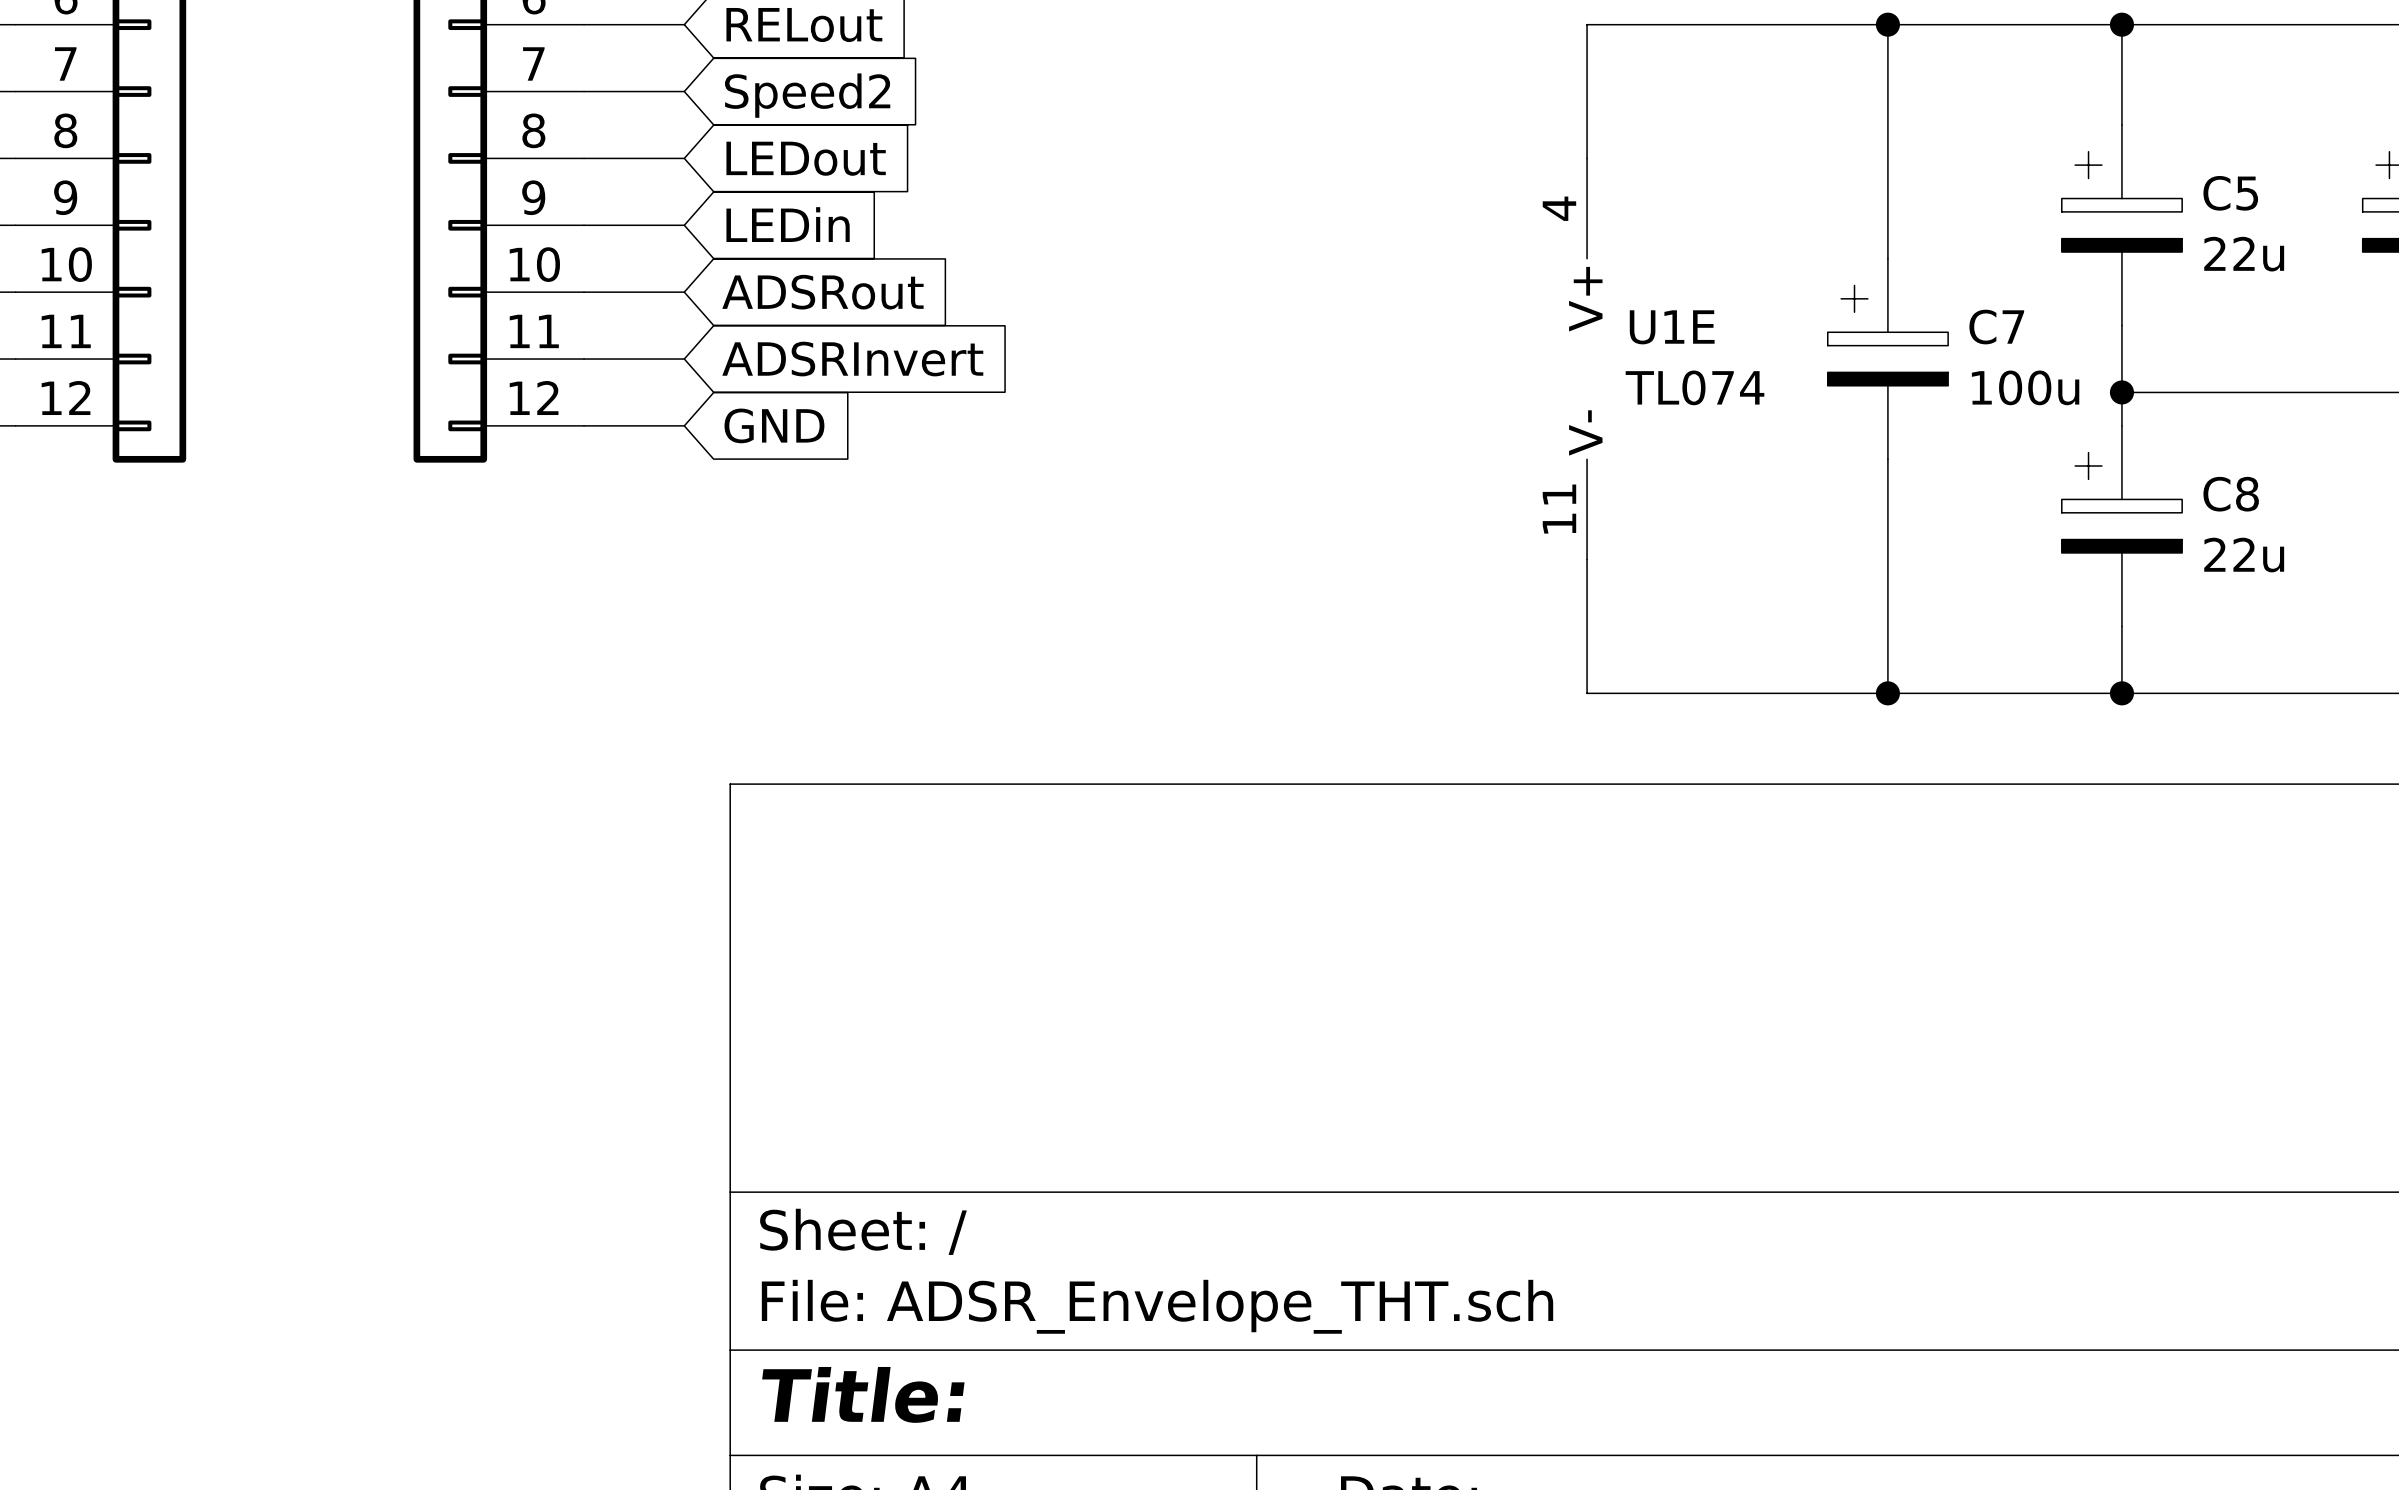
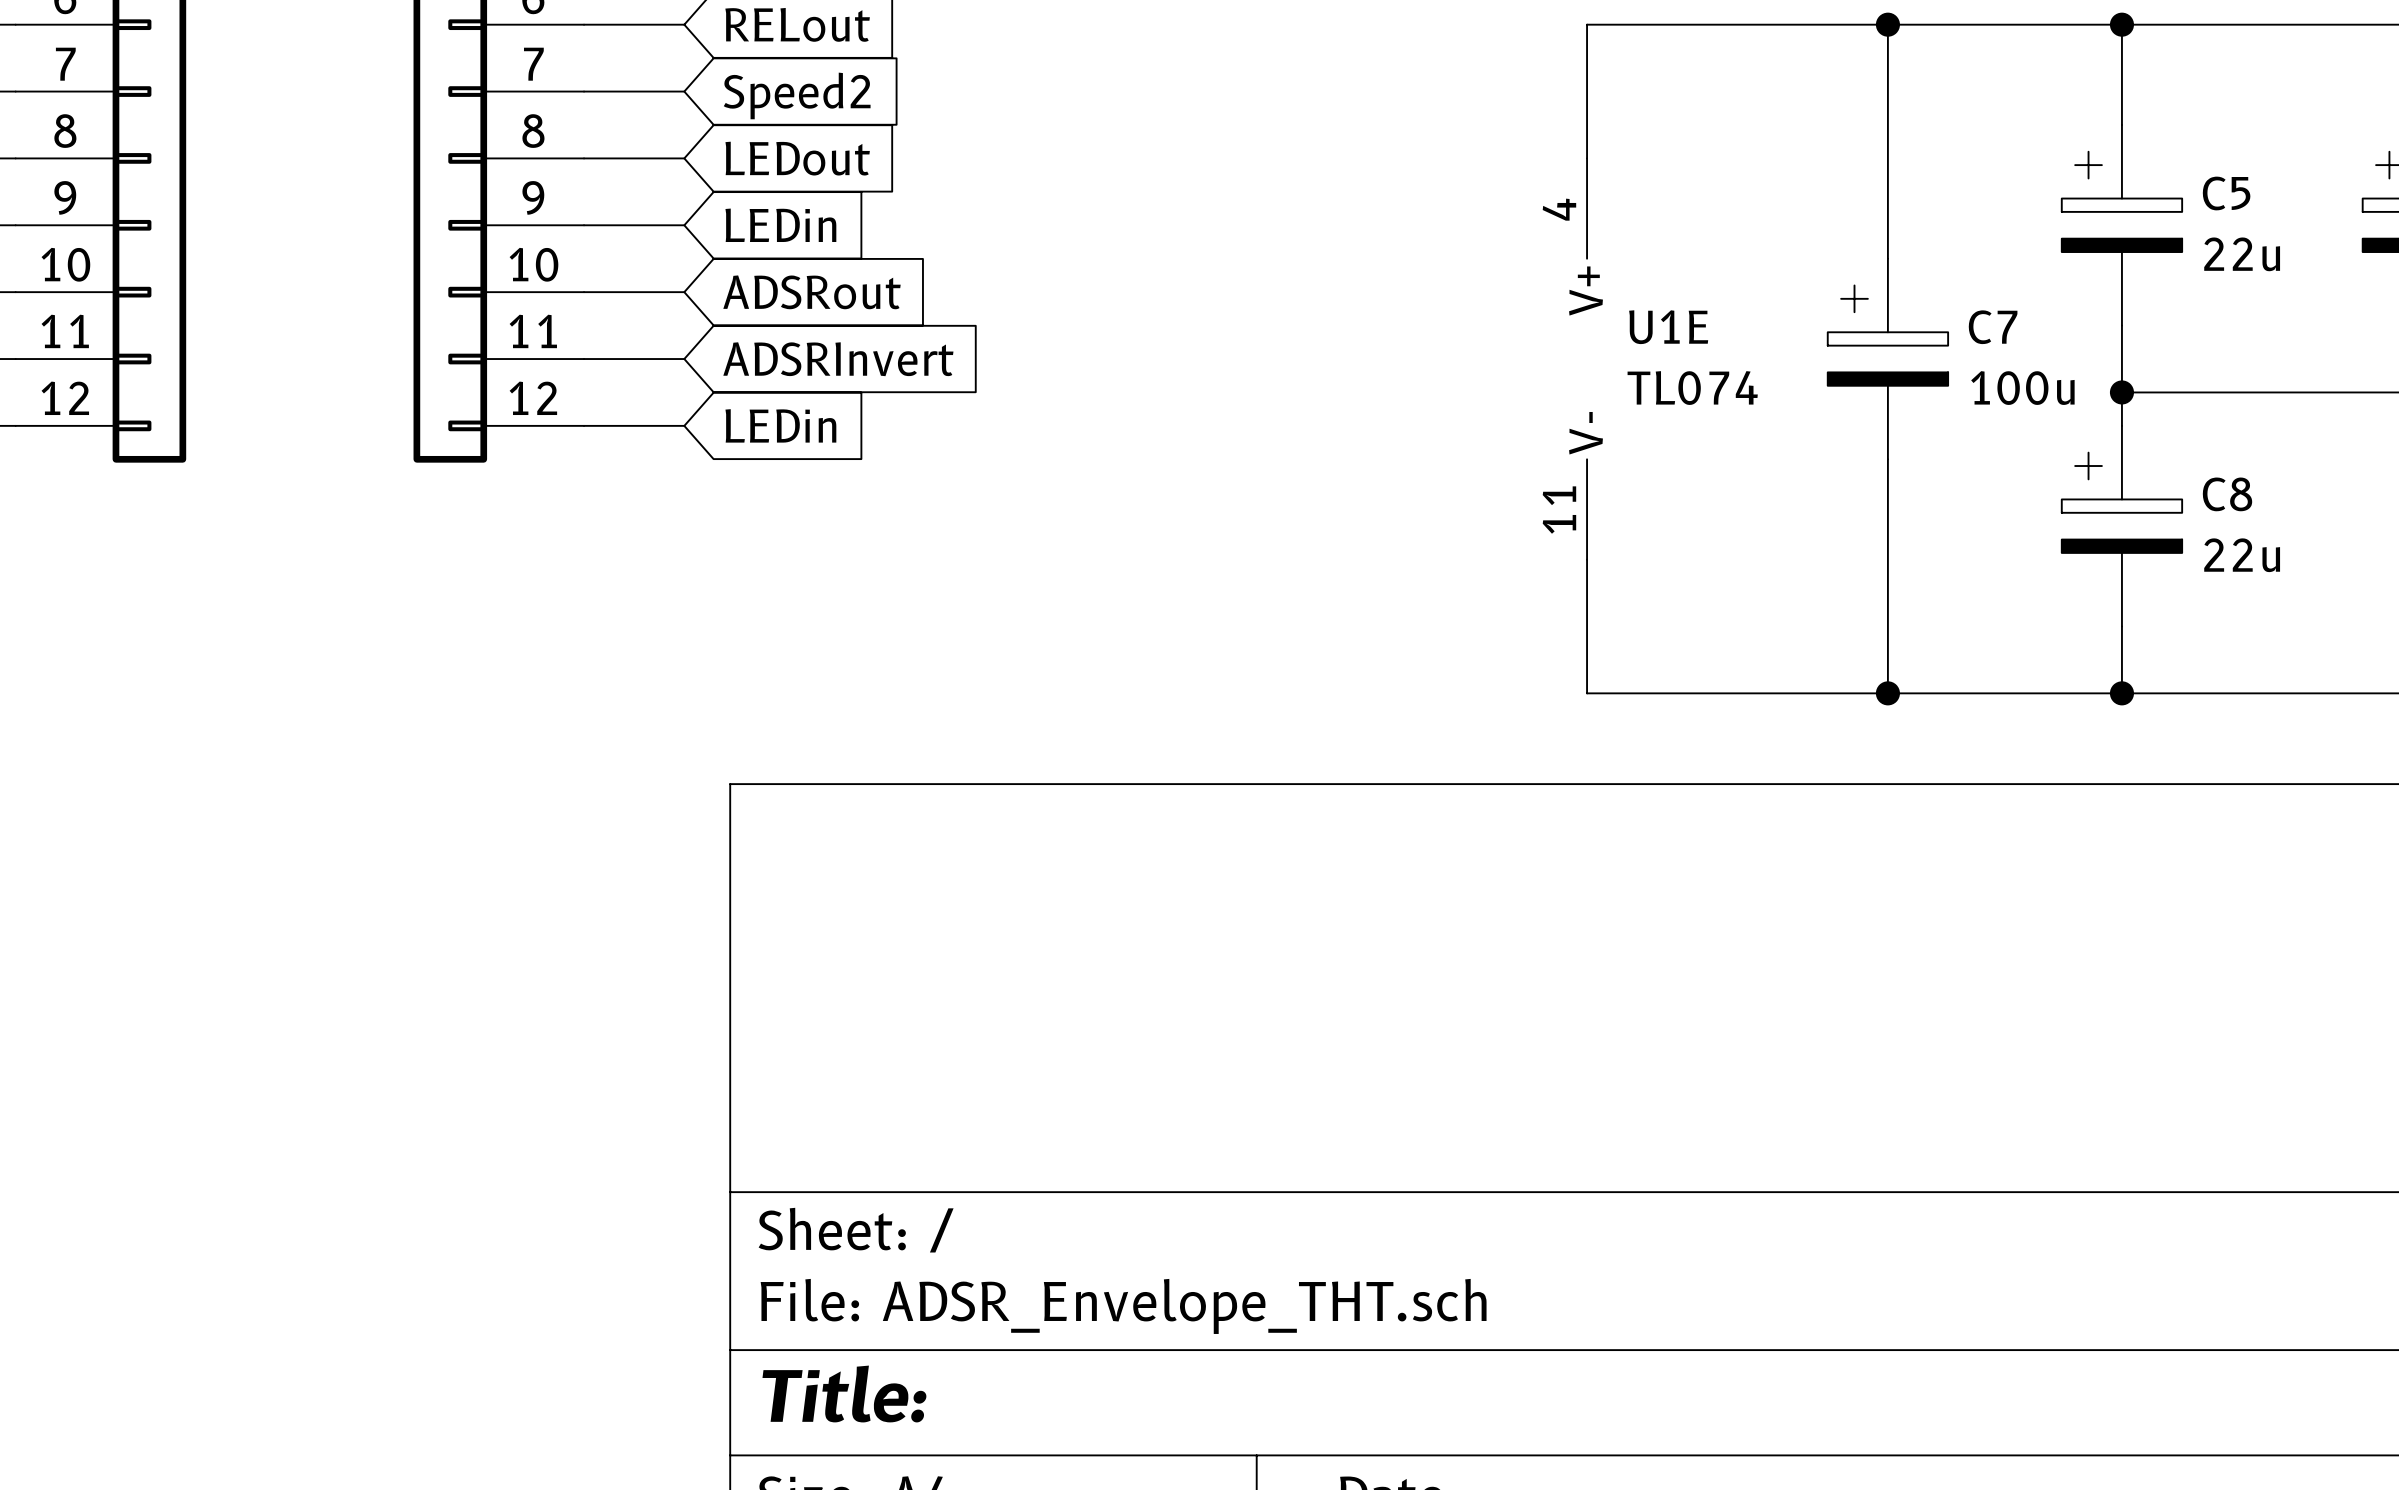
global label: GND (774, 425) -> LEDin (780, 425)

